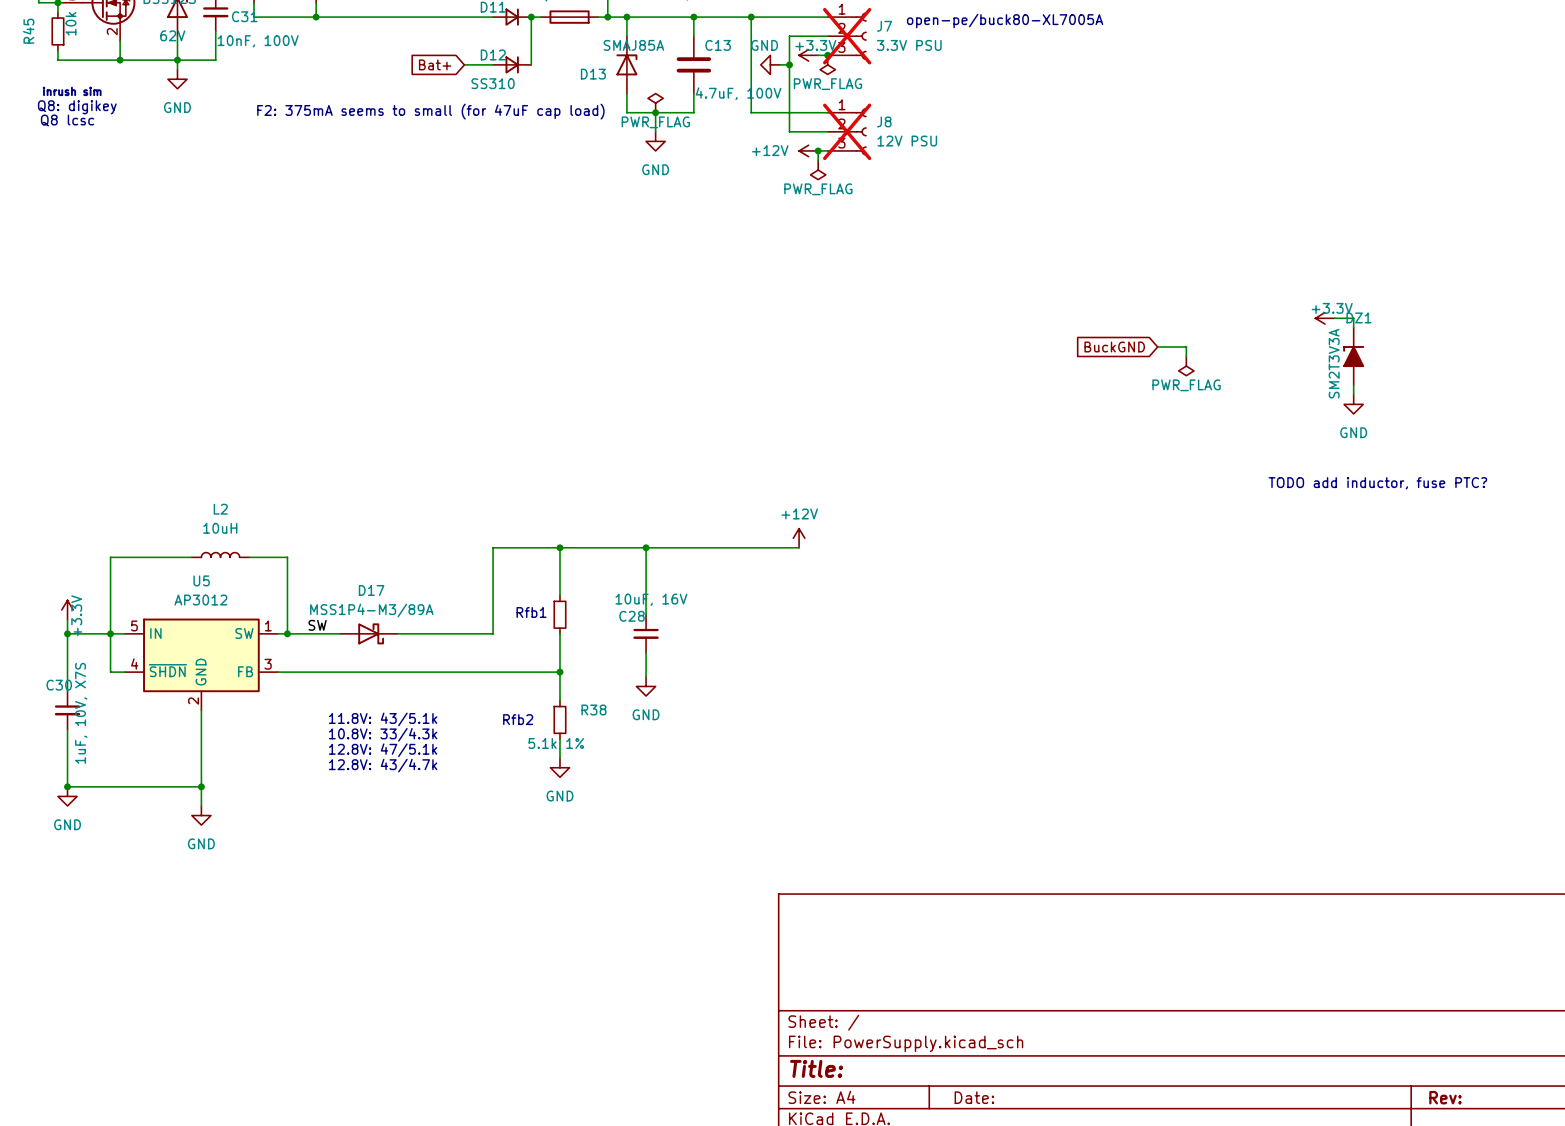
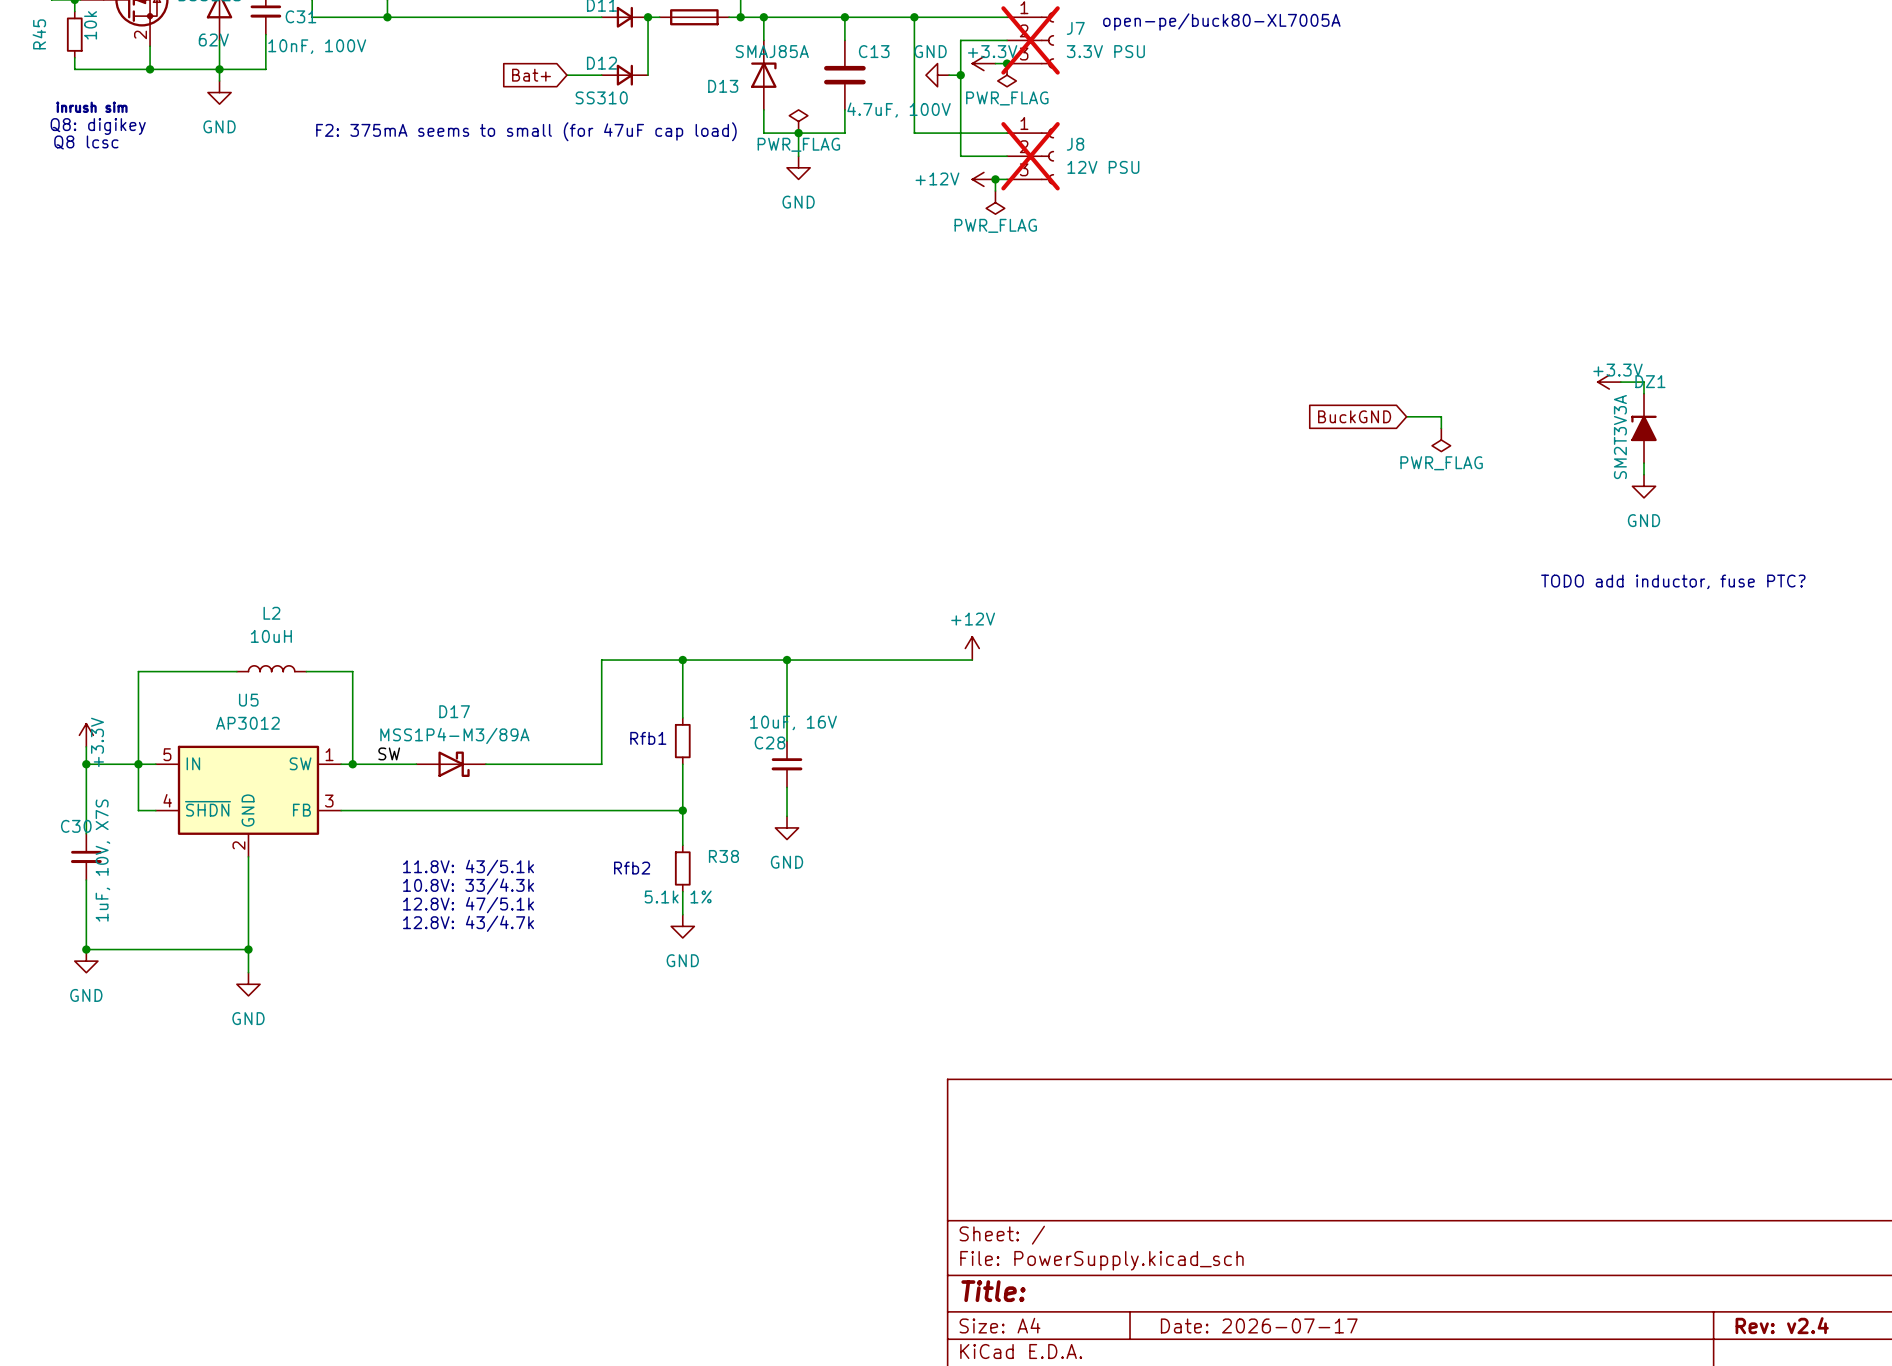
title block: Date: (974, 1097) -> Date: 2026-07-17 (1259, 1325)
title block: Rev: (1445, 1097) -> Rev: v2.4 (1782, 1325)

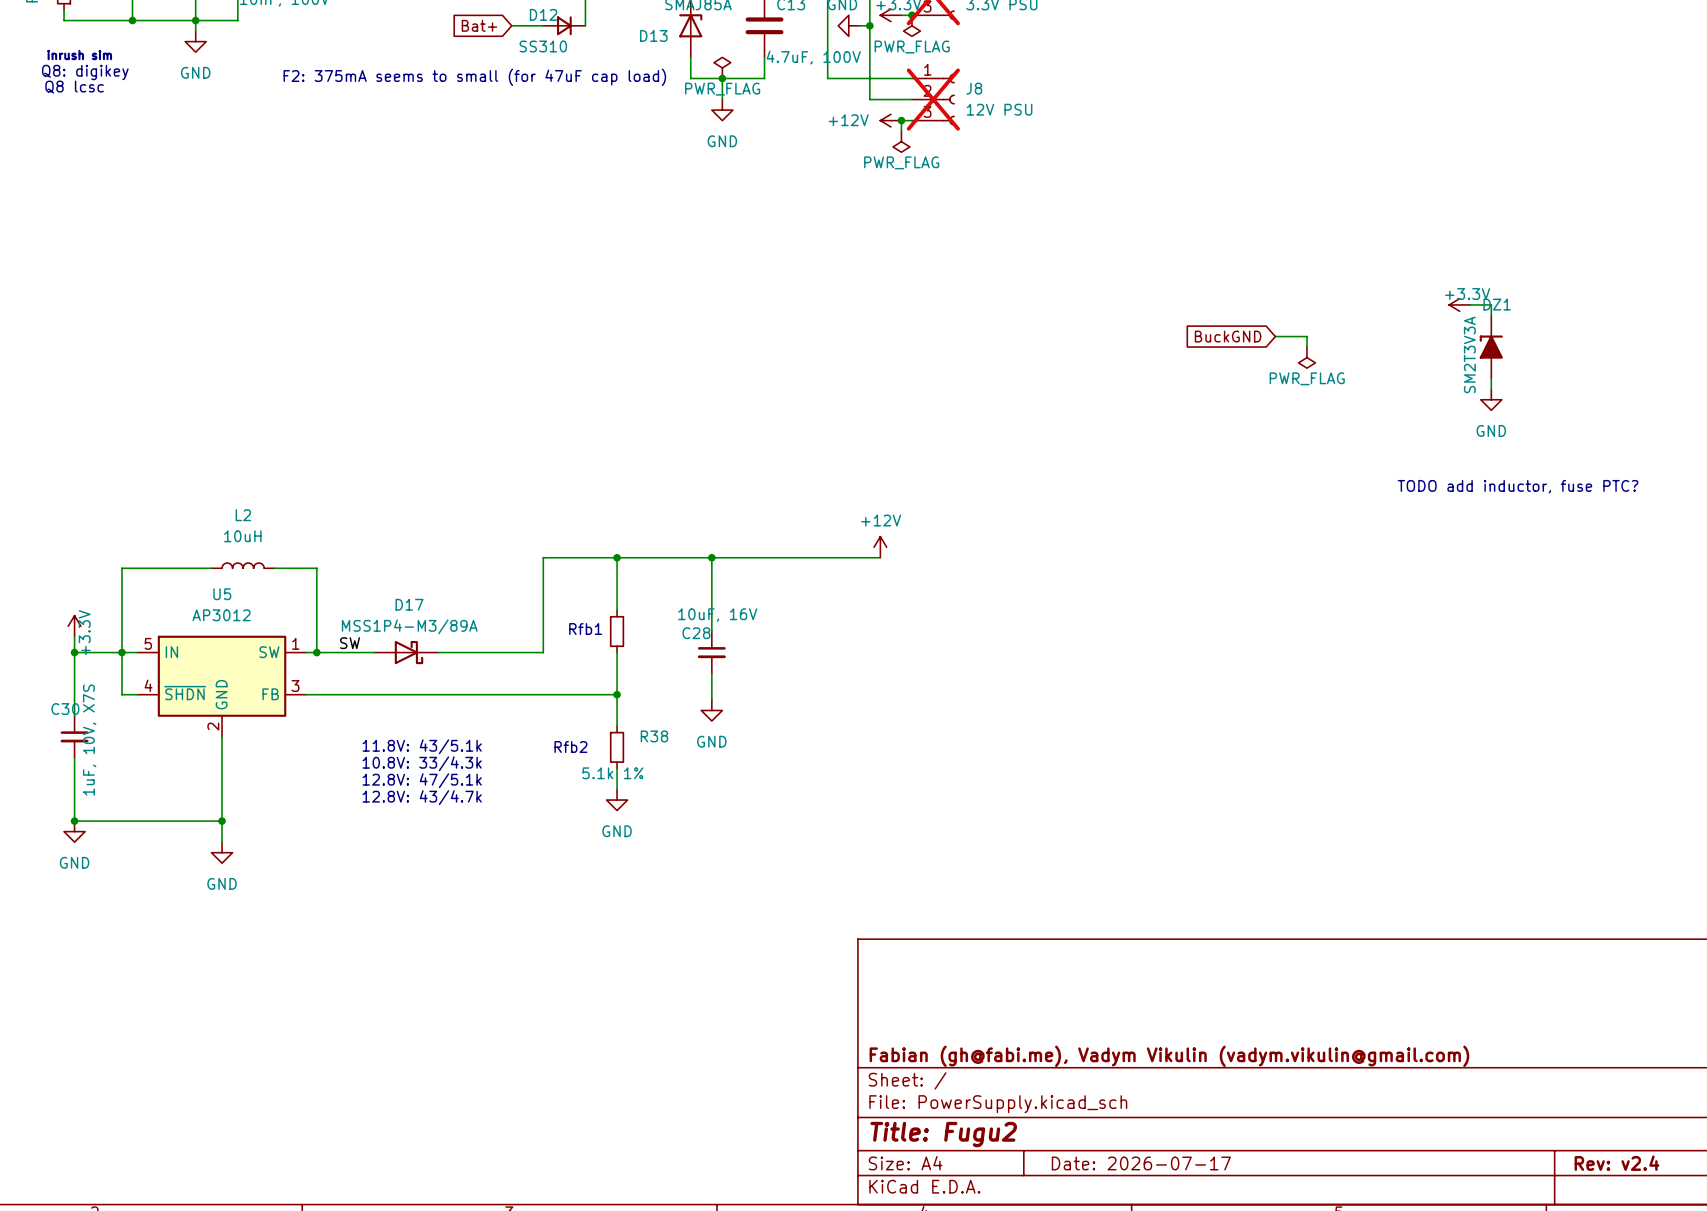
title block: none -> Fabian (gh@fabi.me), Vadym Vikulin (vadym.vikulin@gmail.com) (1169, 1056)
title block: Title: (993, 1291) -> Title: Fugu2 (943, 1134)

